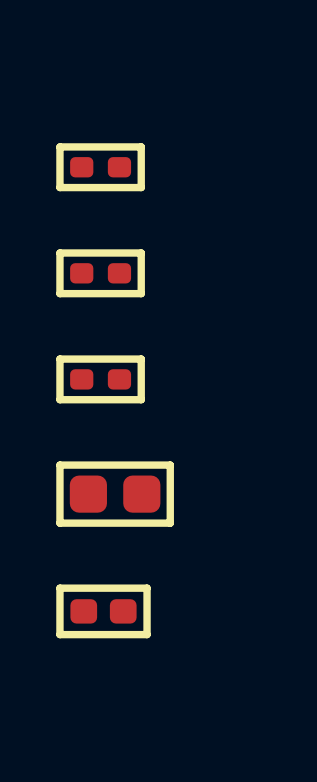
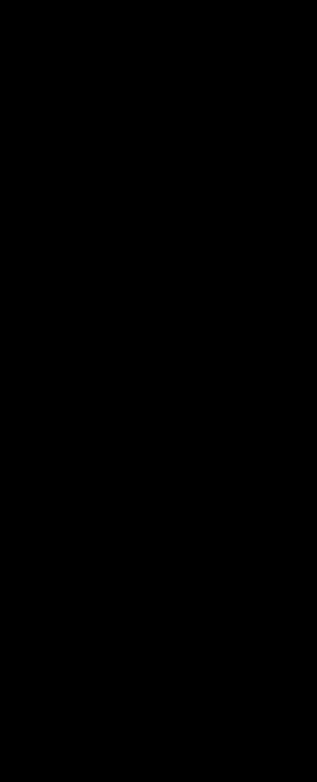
part: (100, 167) -> none
part: (100, 273) -> none
part: (100, 379) -> none
part: (115, 494) -> none
part: (103, 611) -> none

